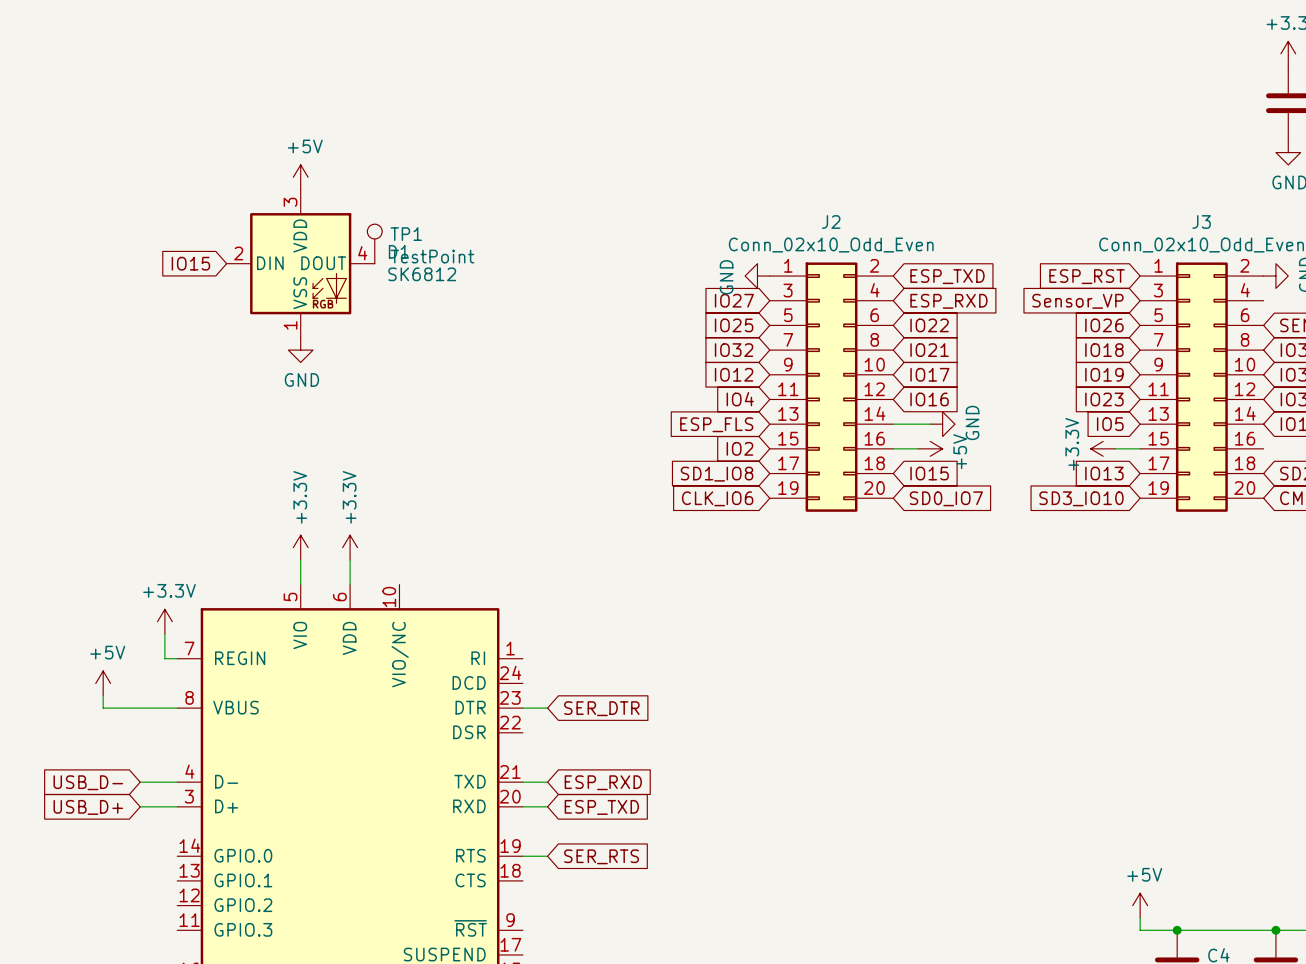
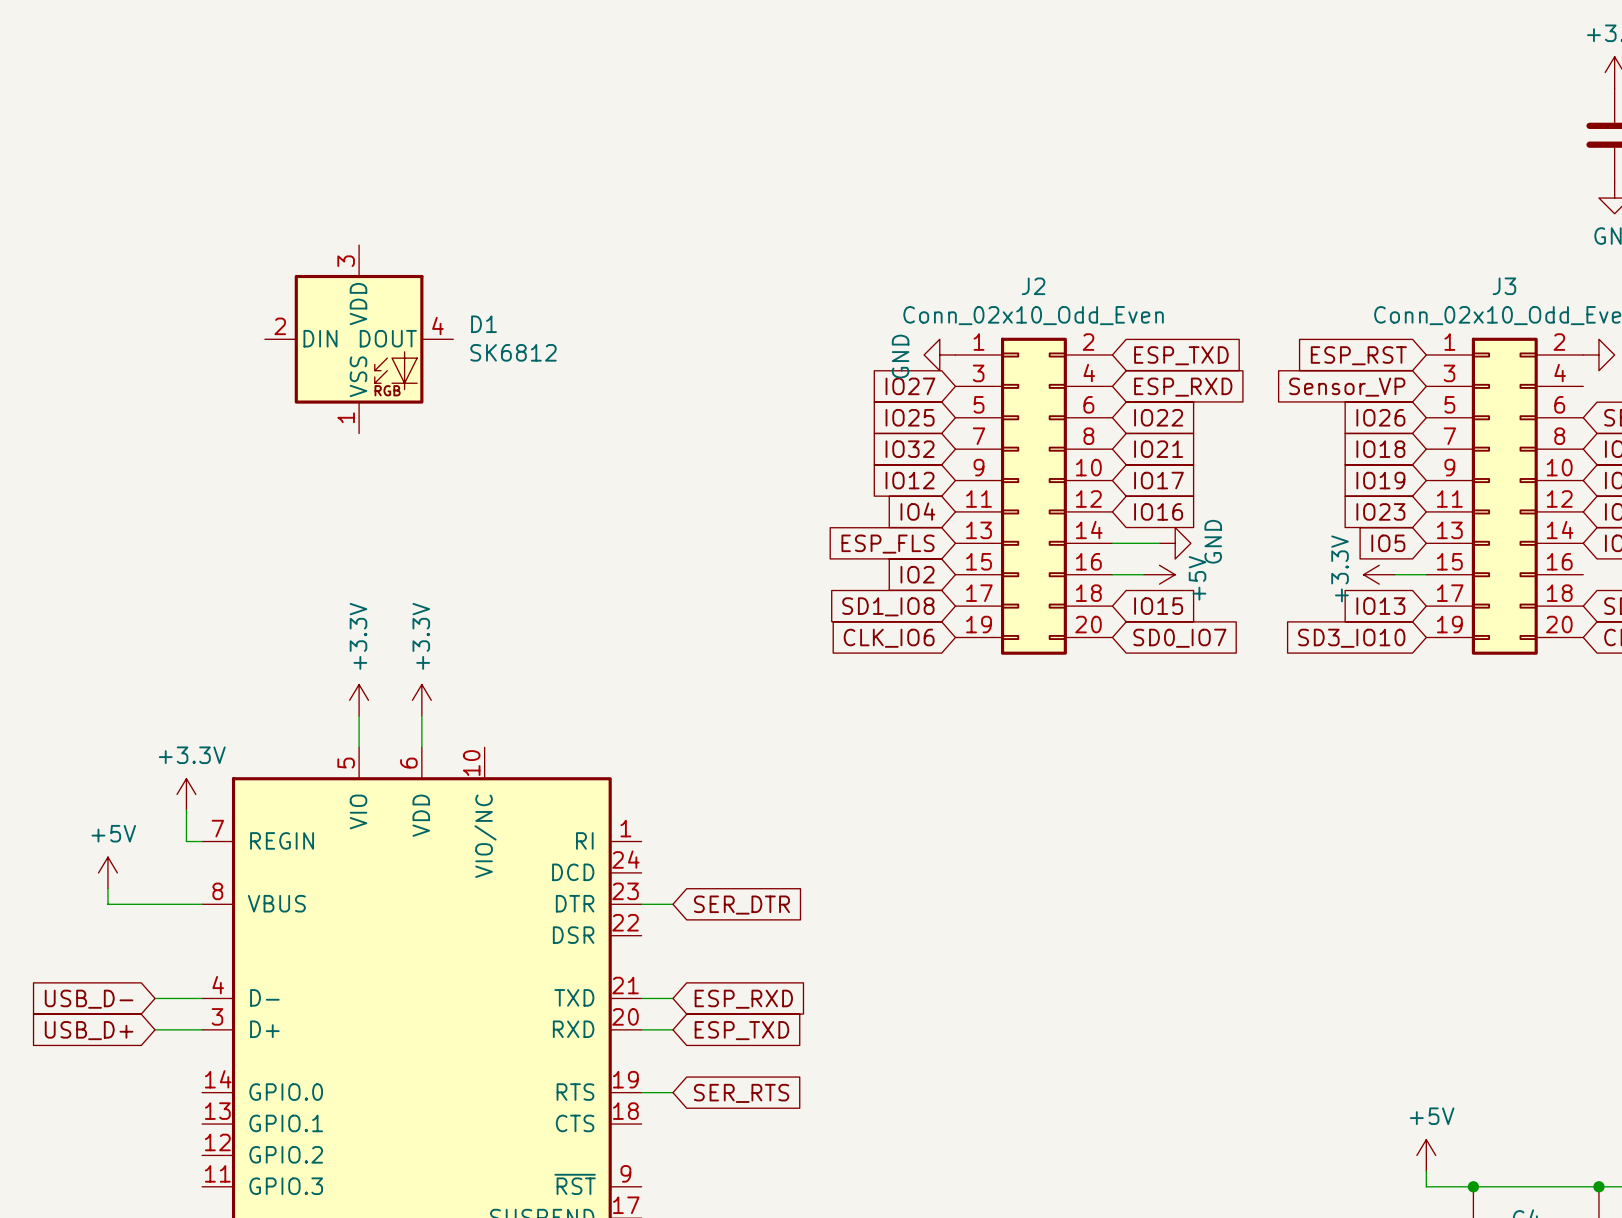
power symbol: +5V (300, 177) -> none
TP1: TestPoint (374, 243) -> none
global label: IO15 (190, 263) -> none
power symbol: GND (300, 350) -> none

